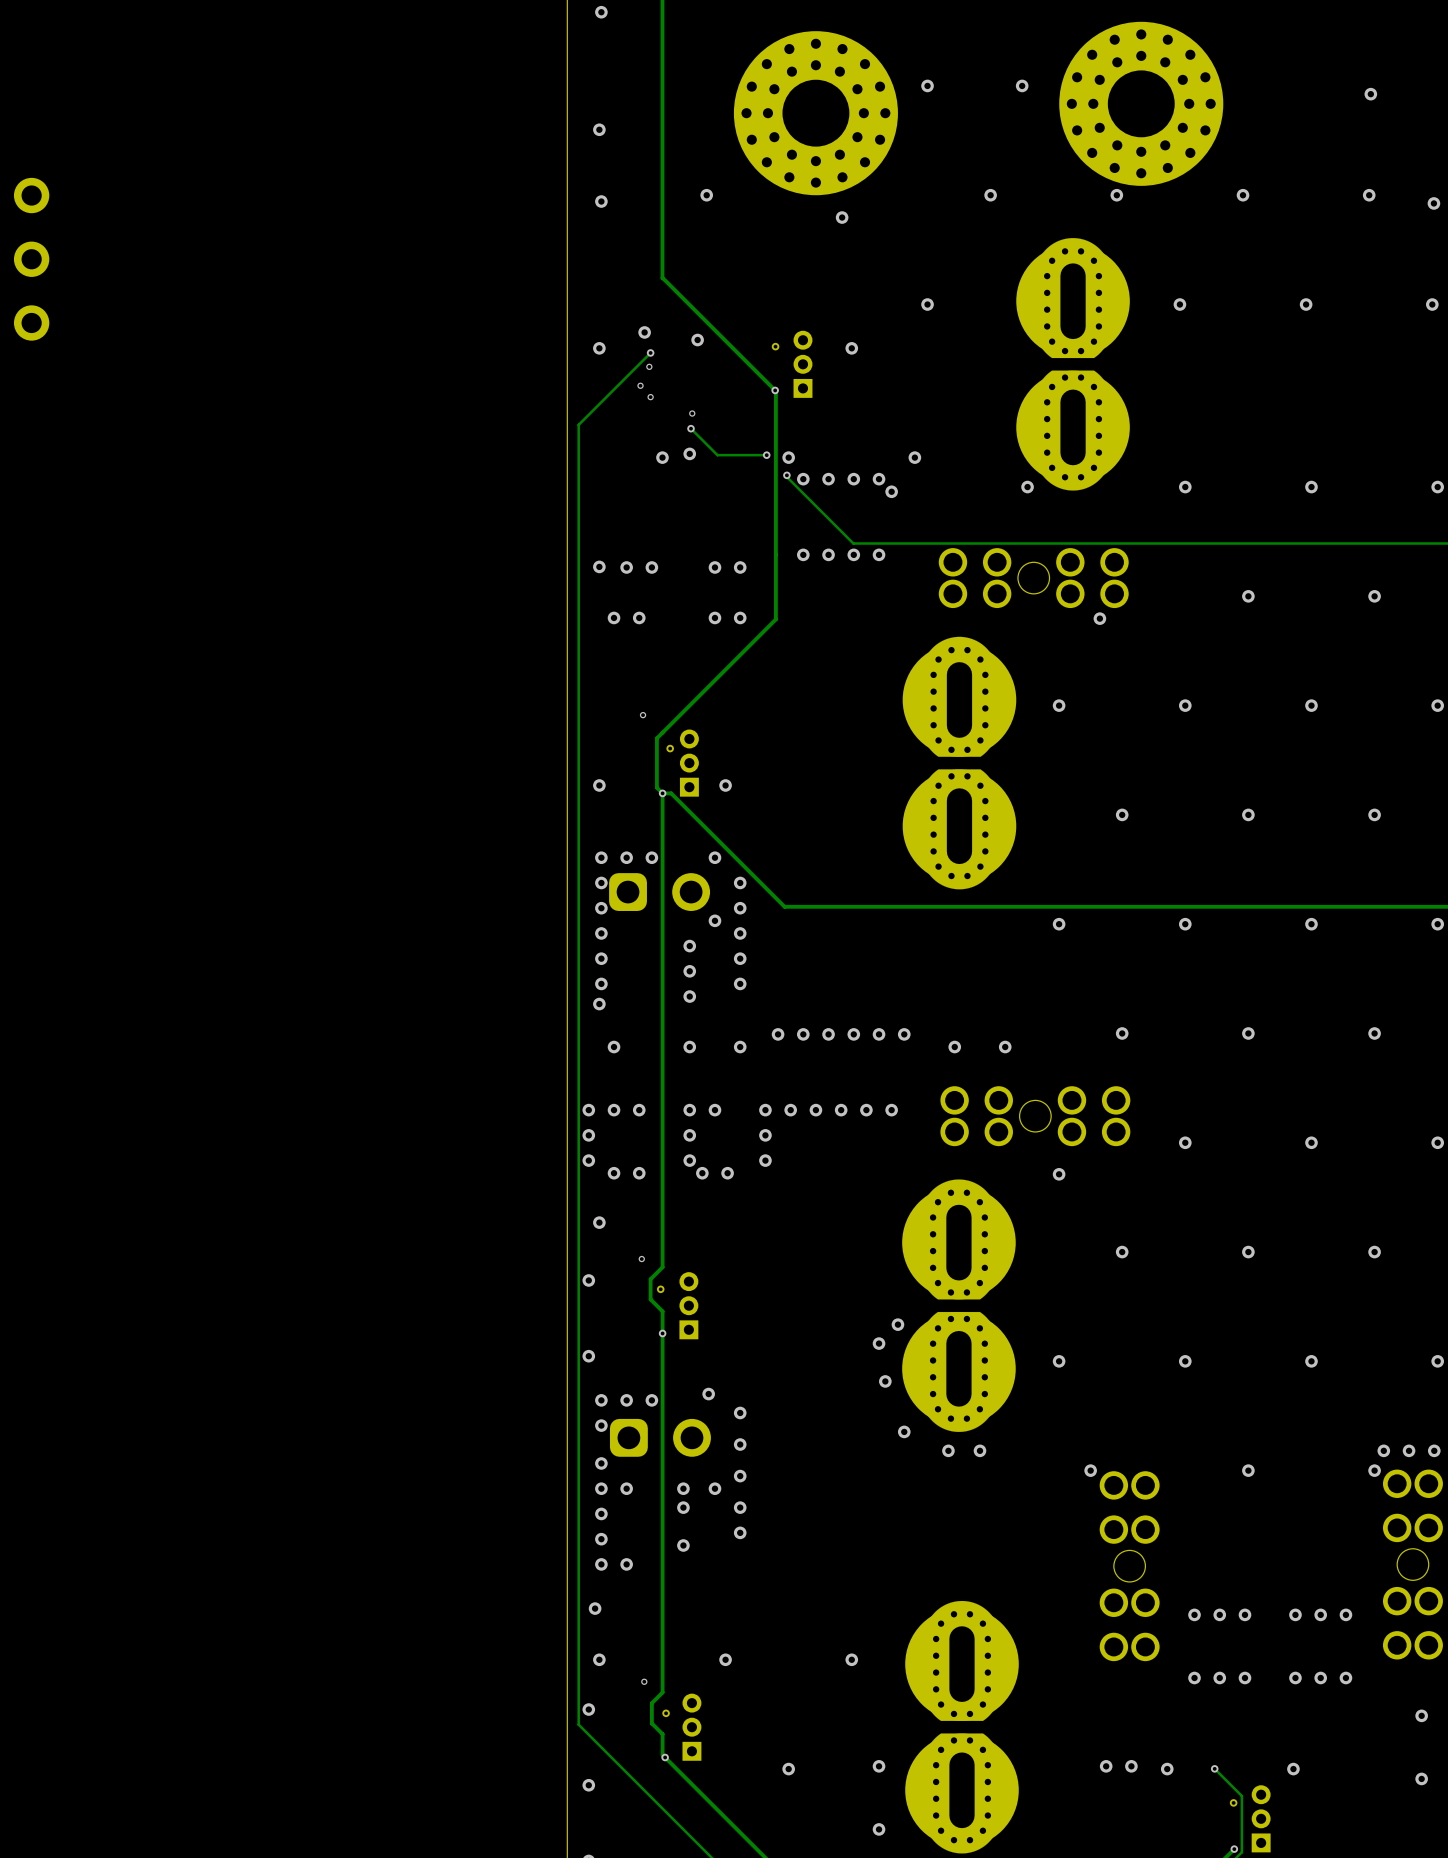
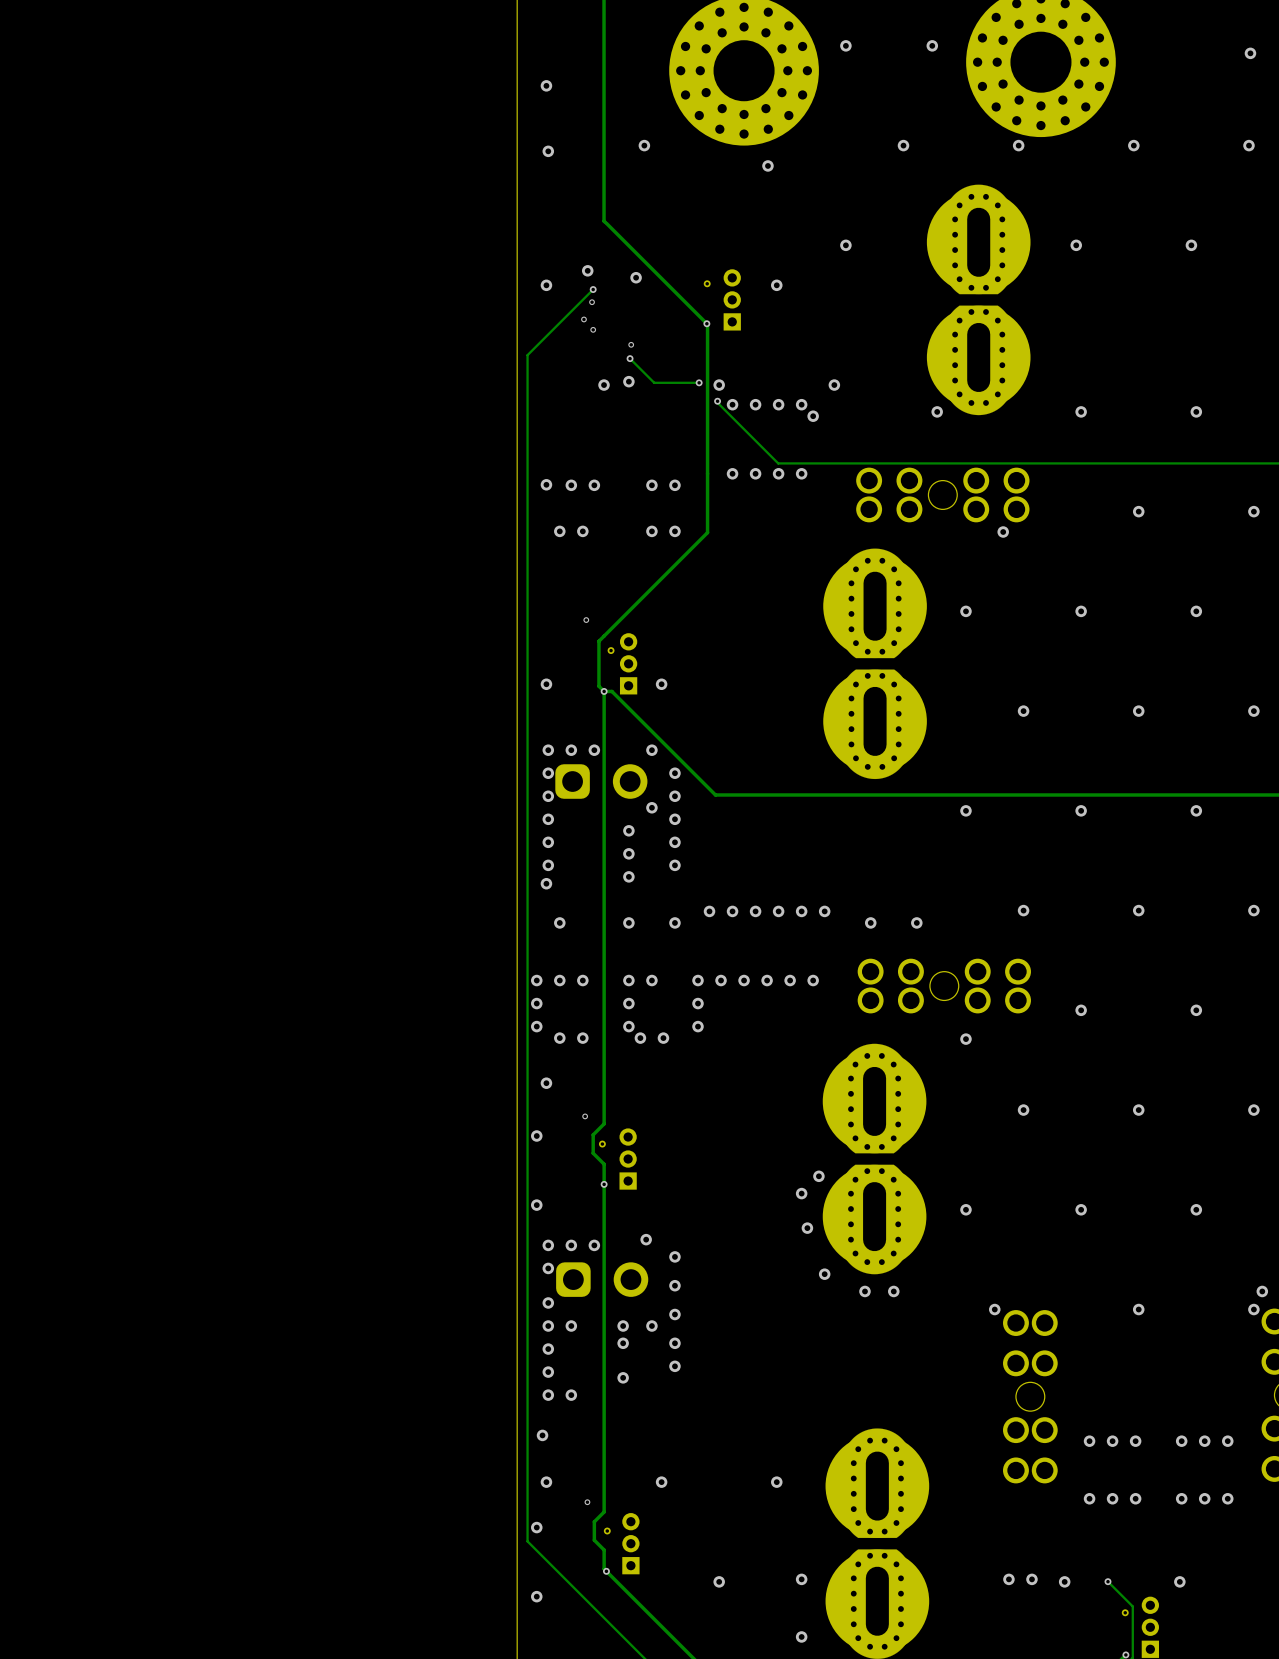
part: (31, 195) -> none
part: (31, 259) -> none
part: (31, 322) -> none

